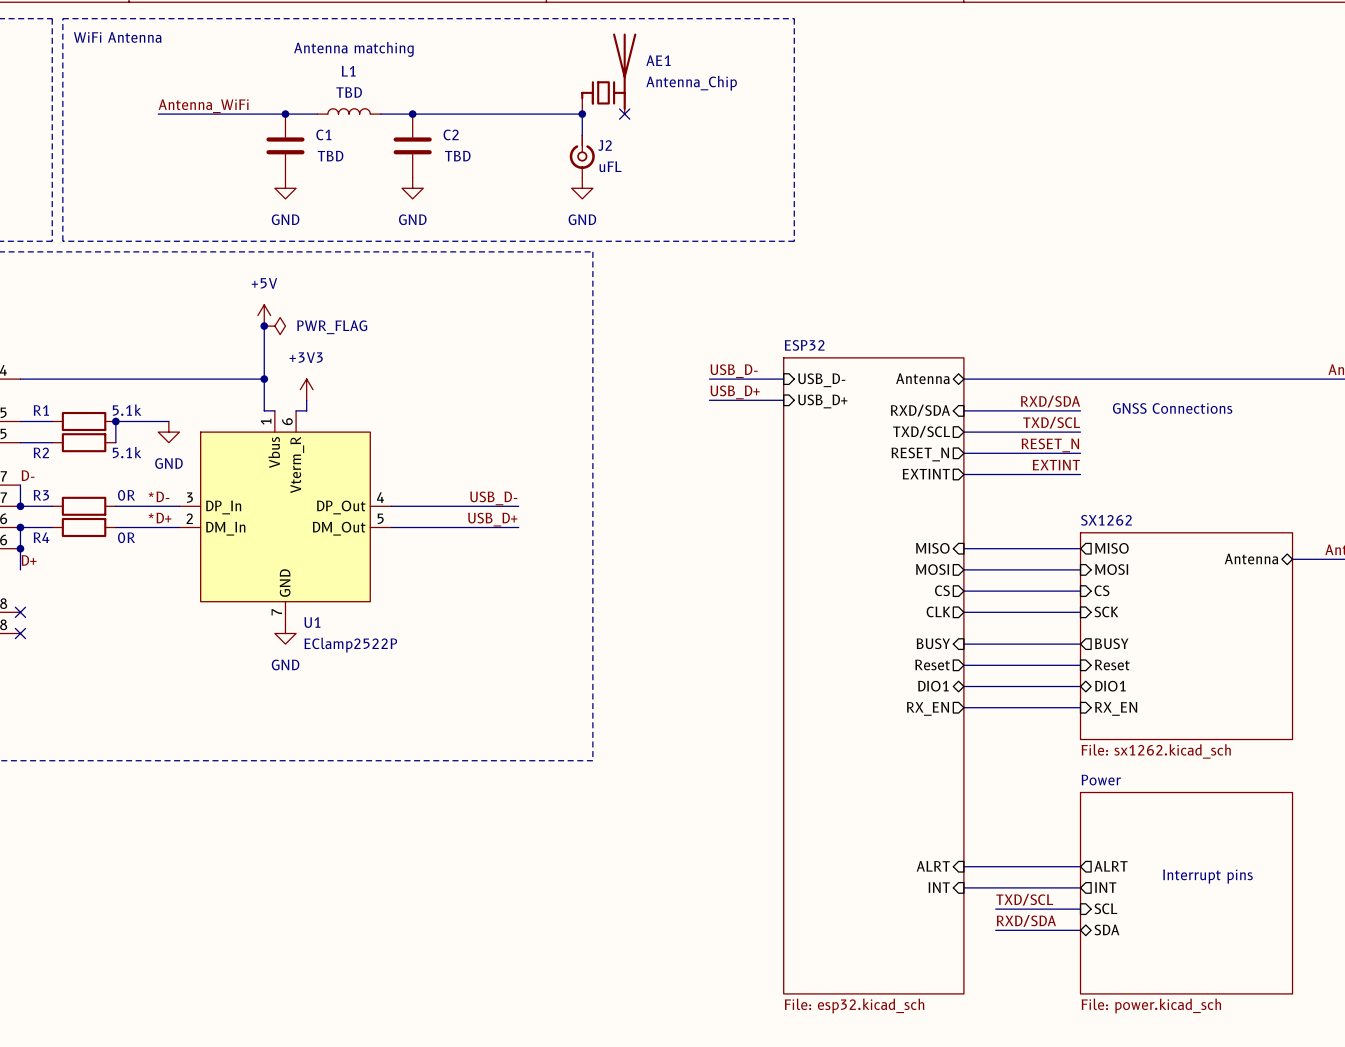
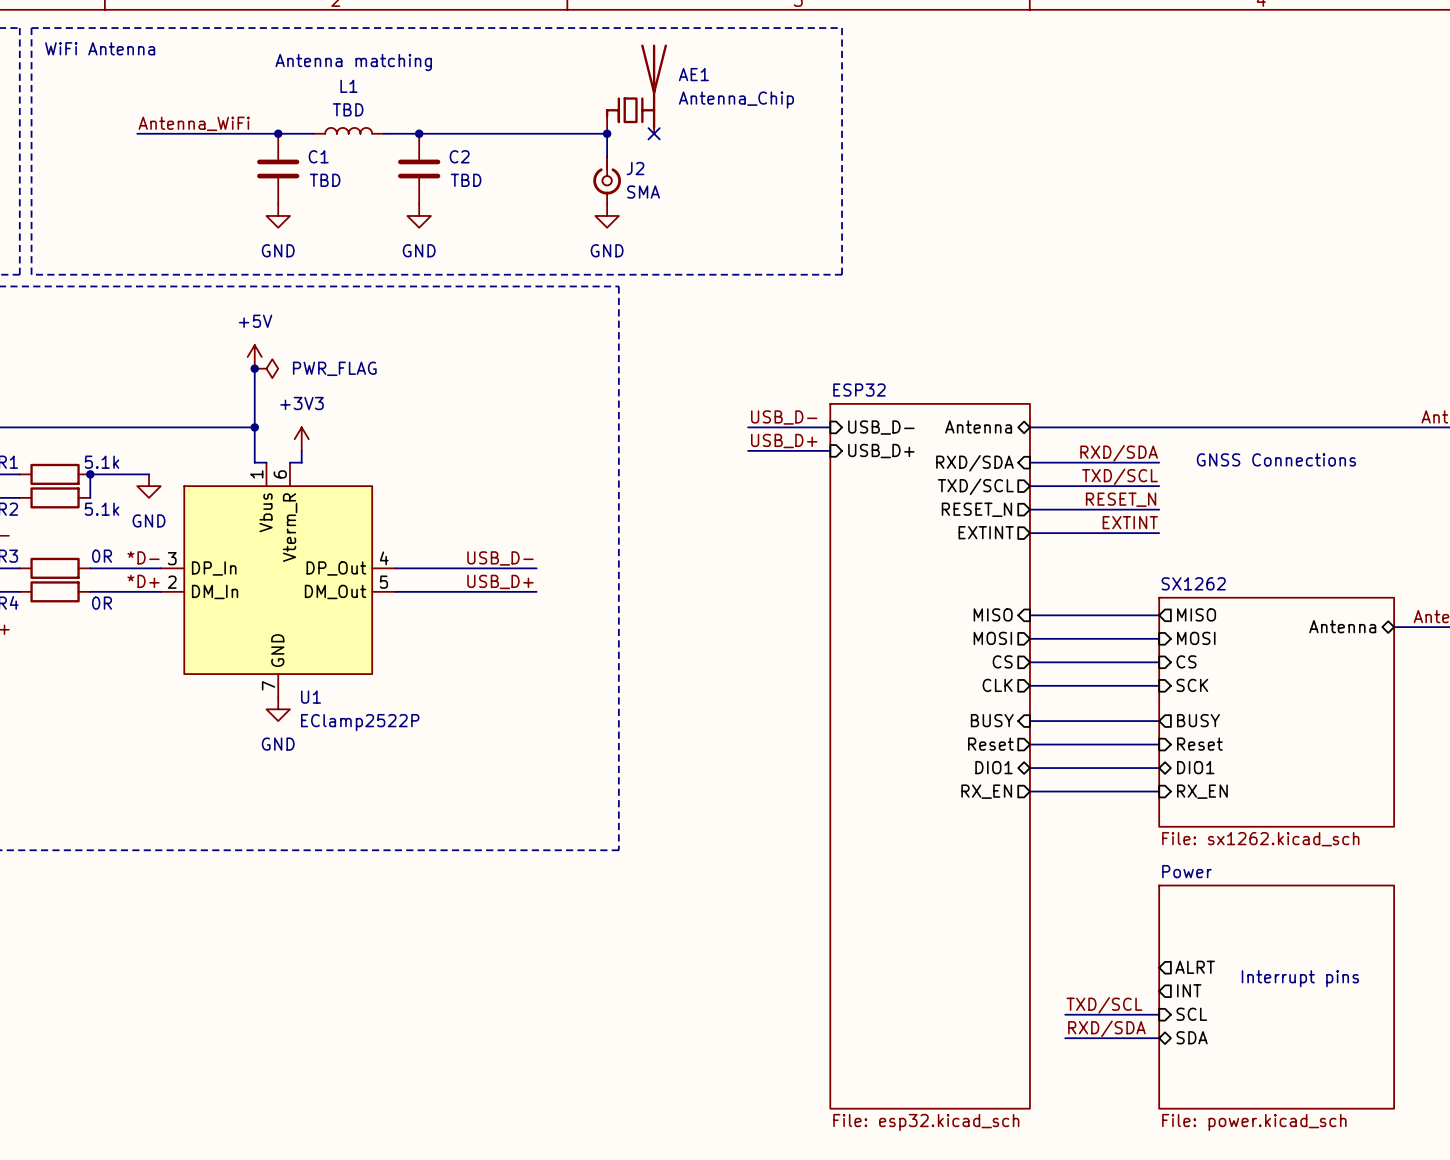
J2 value: uFL (610, 166) -> SMA (643, 192)
sheet pin: ALRT (933, 866) -> none
wire: (963, 866) (1080, 866) -> none
sheet pin: INT (939, 887) -> none
wire: (963, 887) (1080, 887) -> none

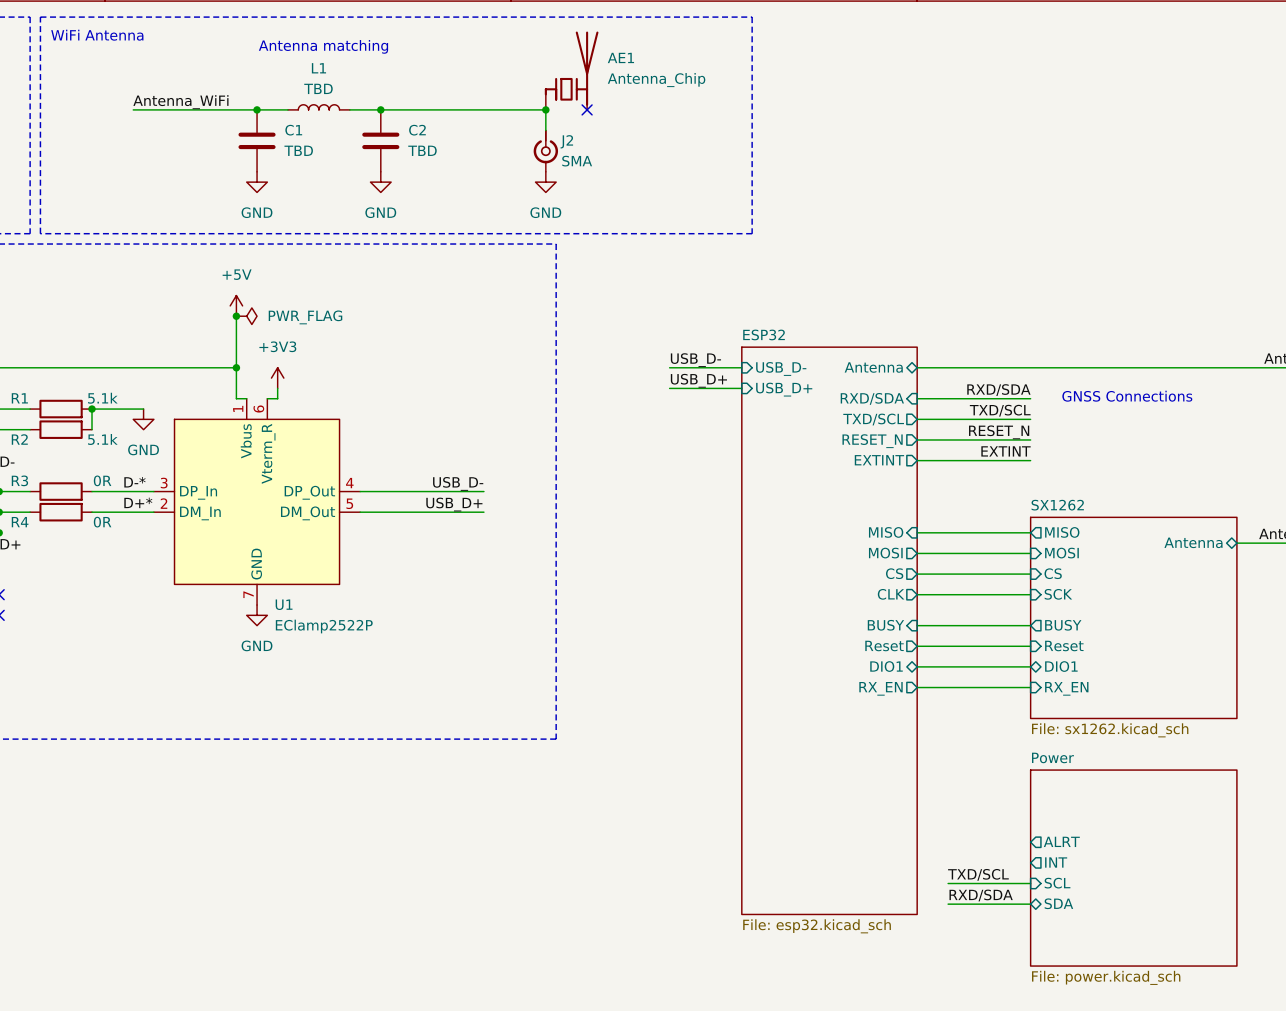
sheet ESP32 shape: [829, 403, 1031, 1110] -> [741, 346, 918, 916]
label: *D- (143, 557) -> D-* (134, 482)
label: *D+ (143, 581) -> D+* (138, 502)
text: Interrupt pins (1300, 978) -> none
sheet ESP32 value position: File: esp32.kicad_sch (926, 1122) -> File: esp32.kicad_sch (817, 926)

